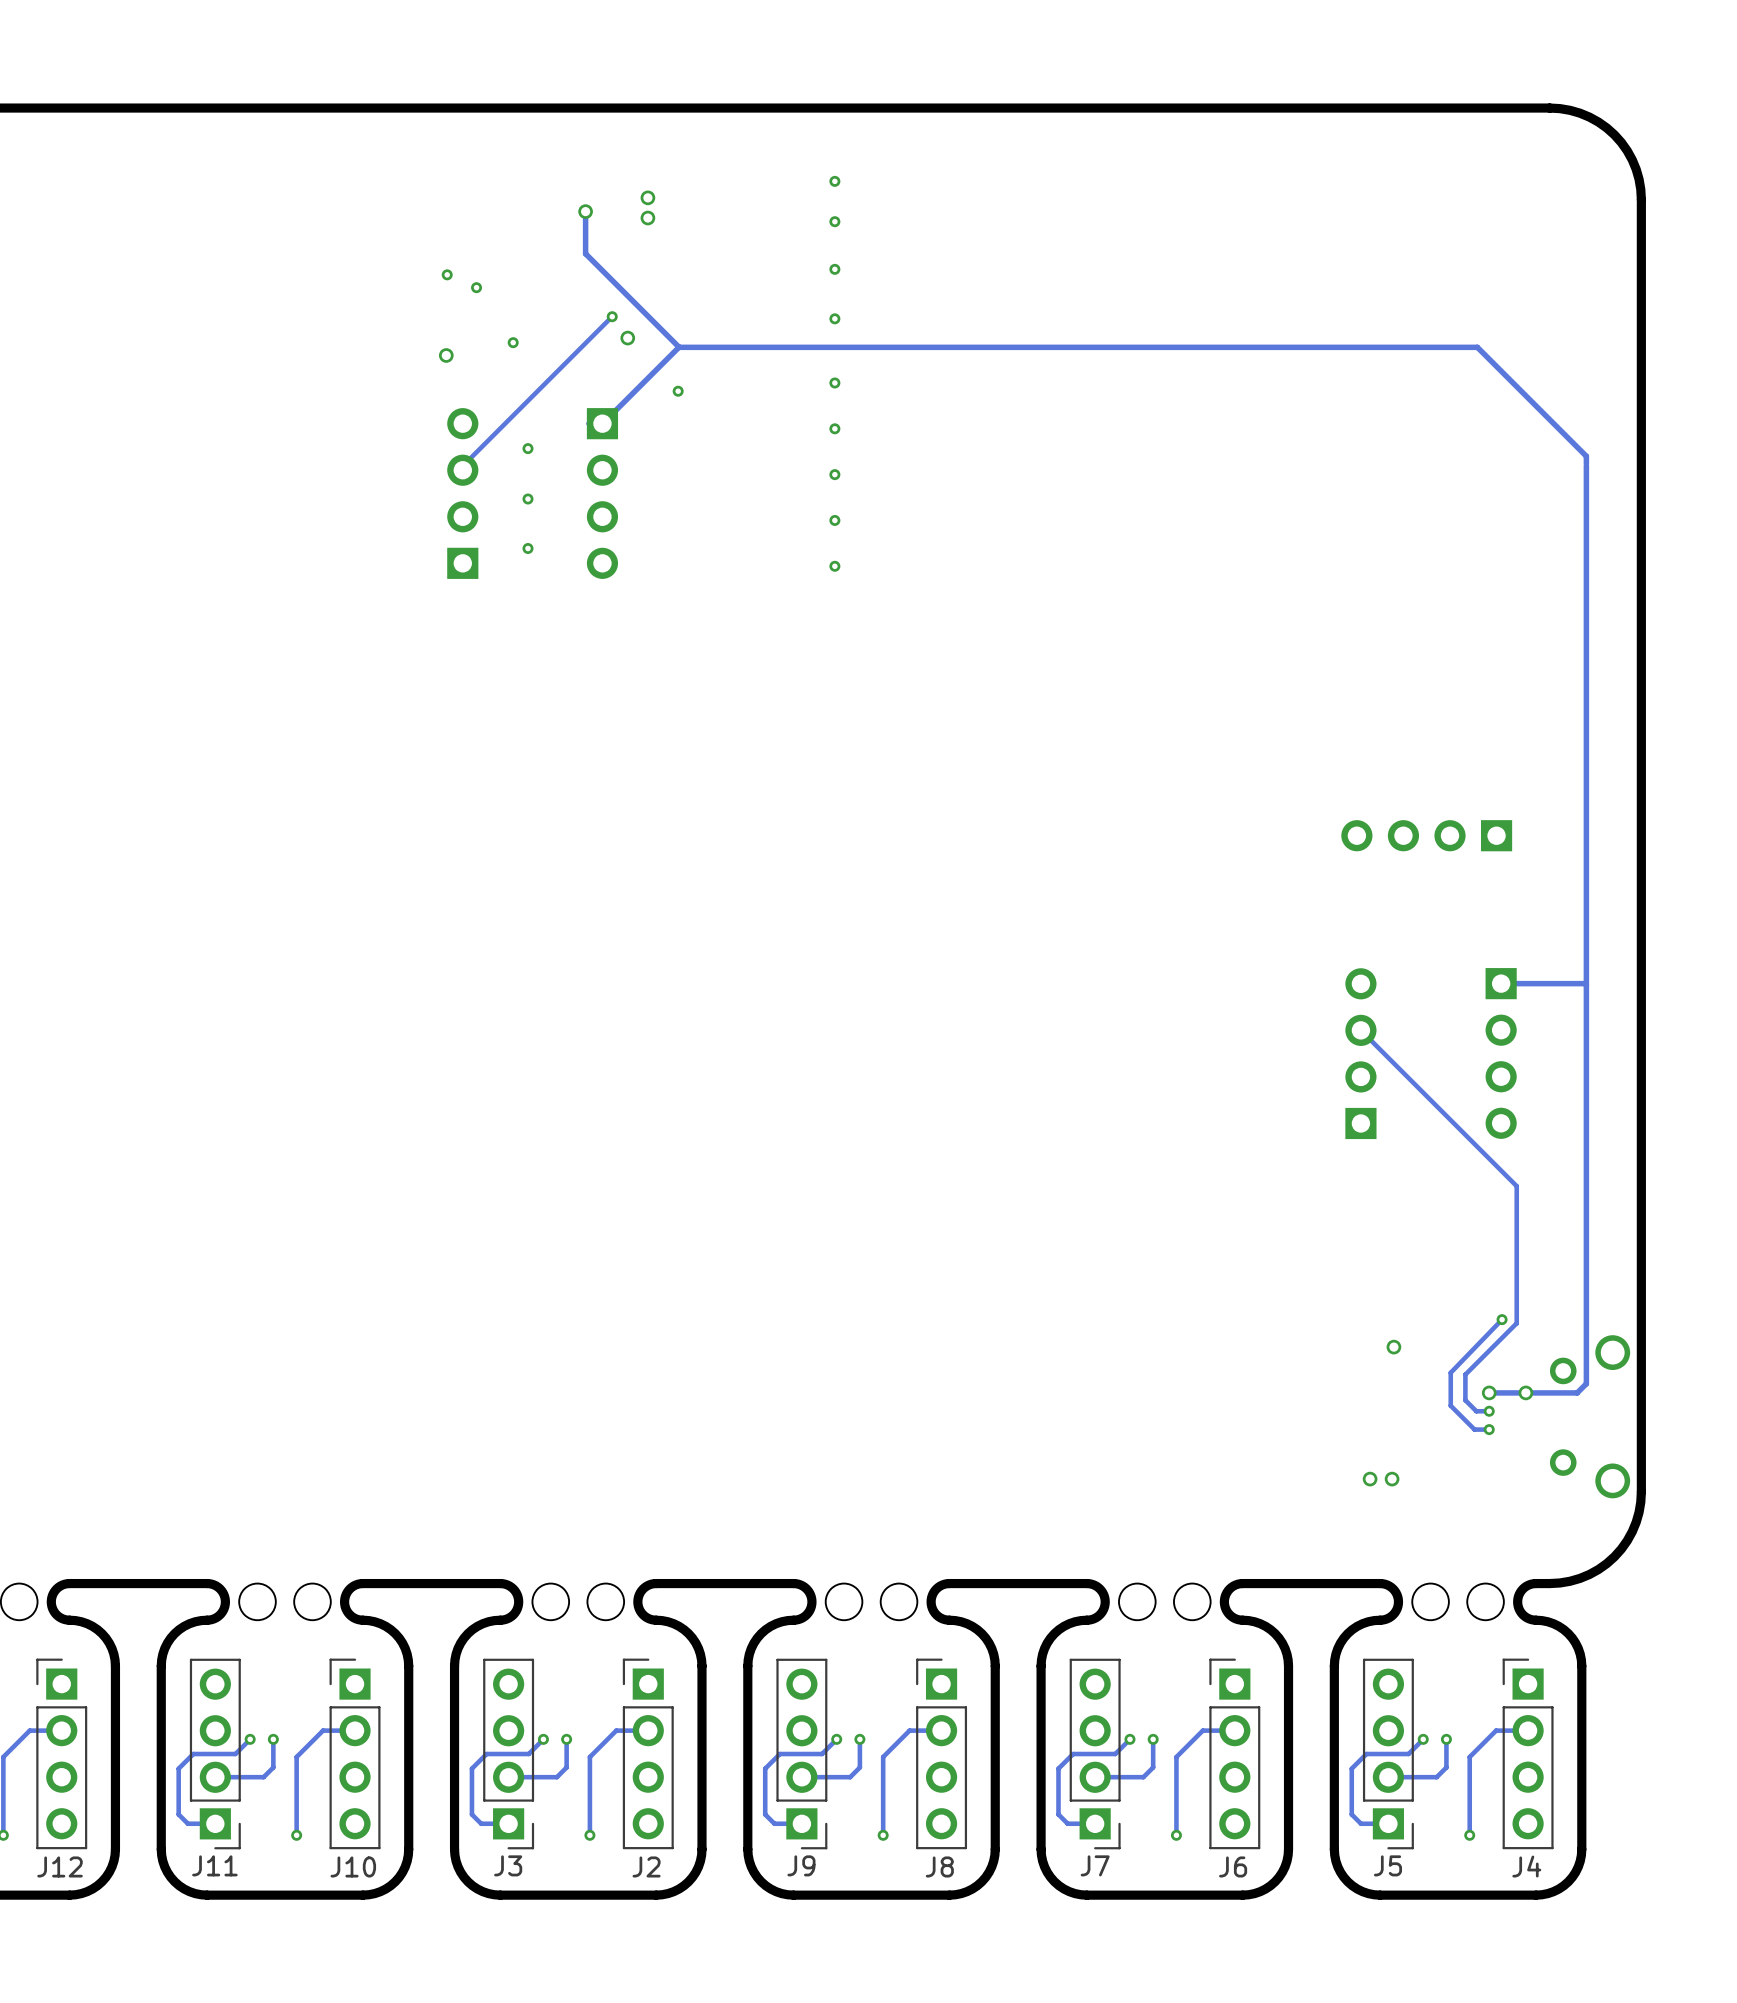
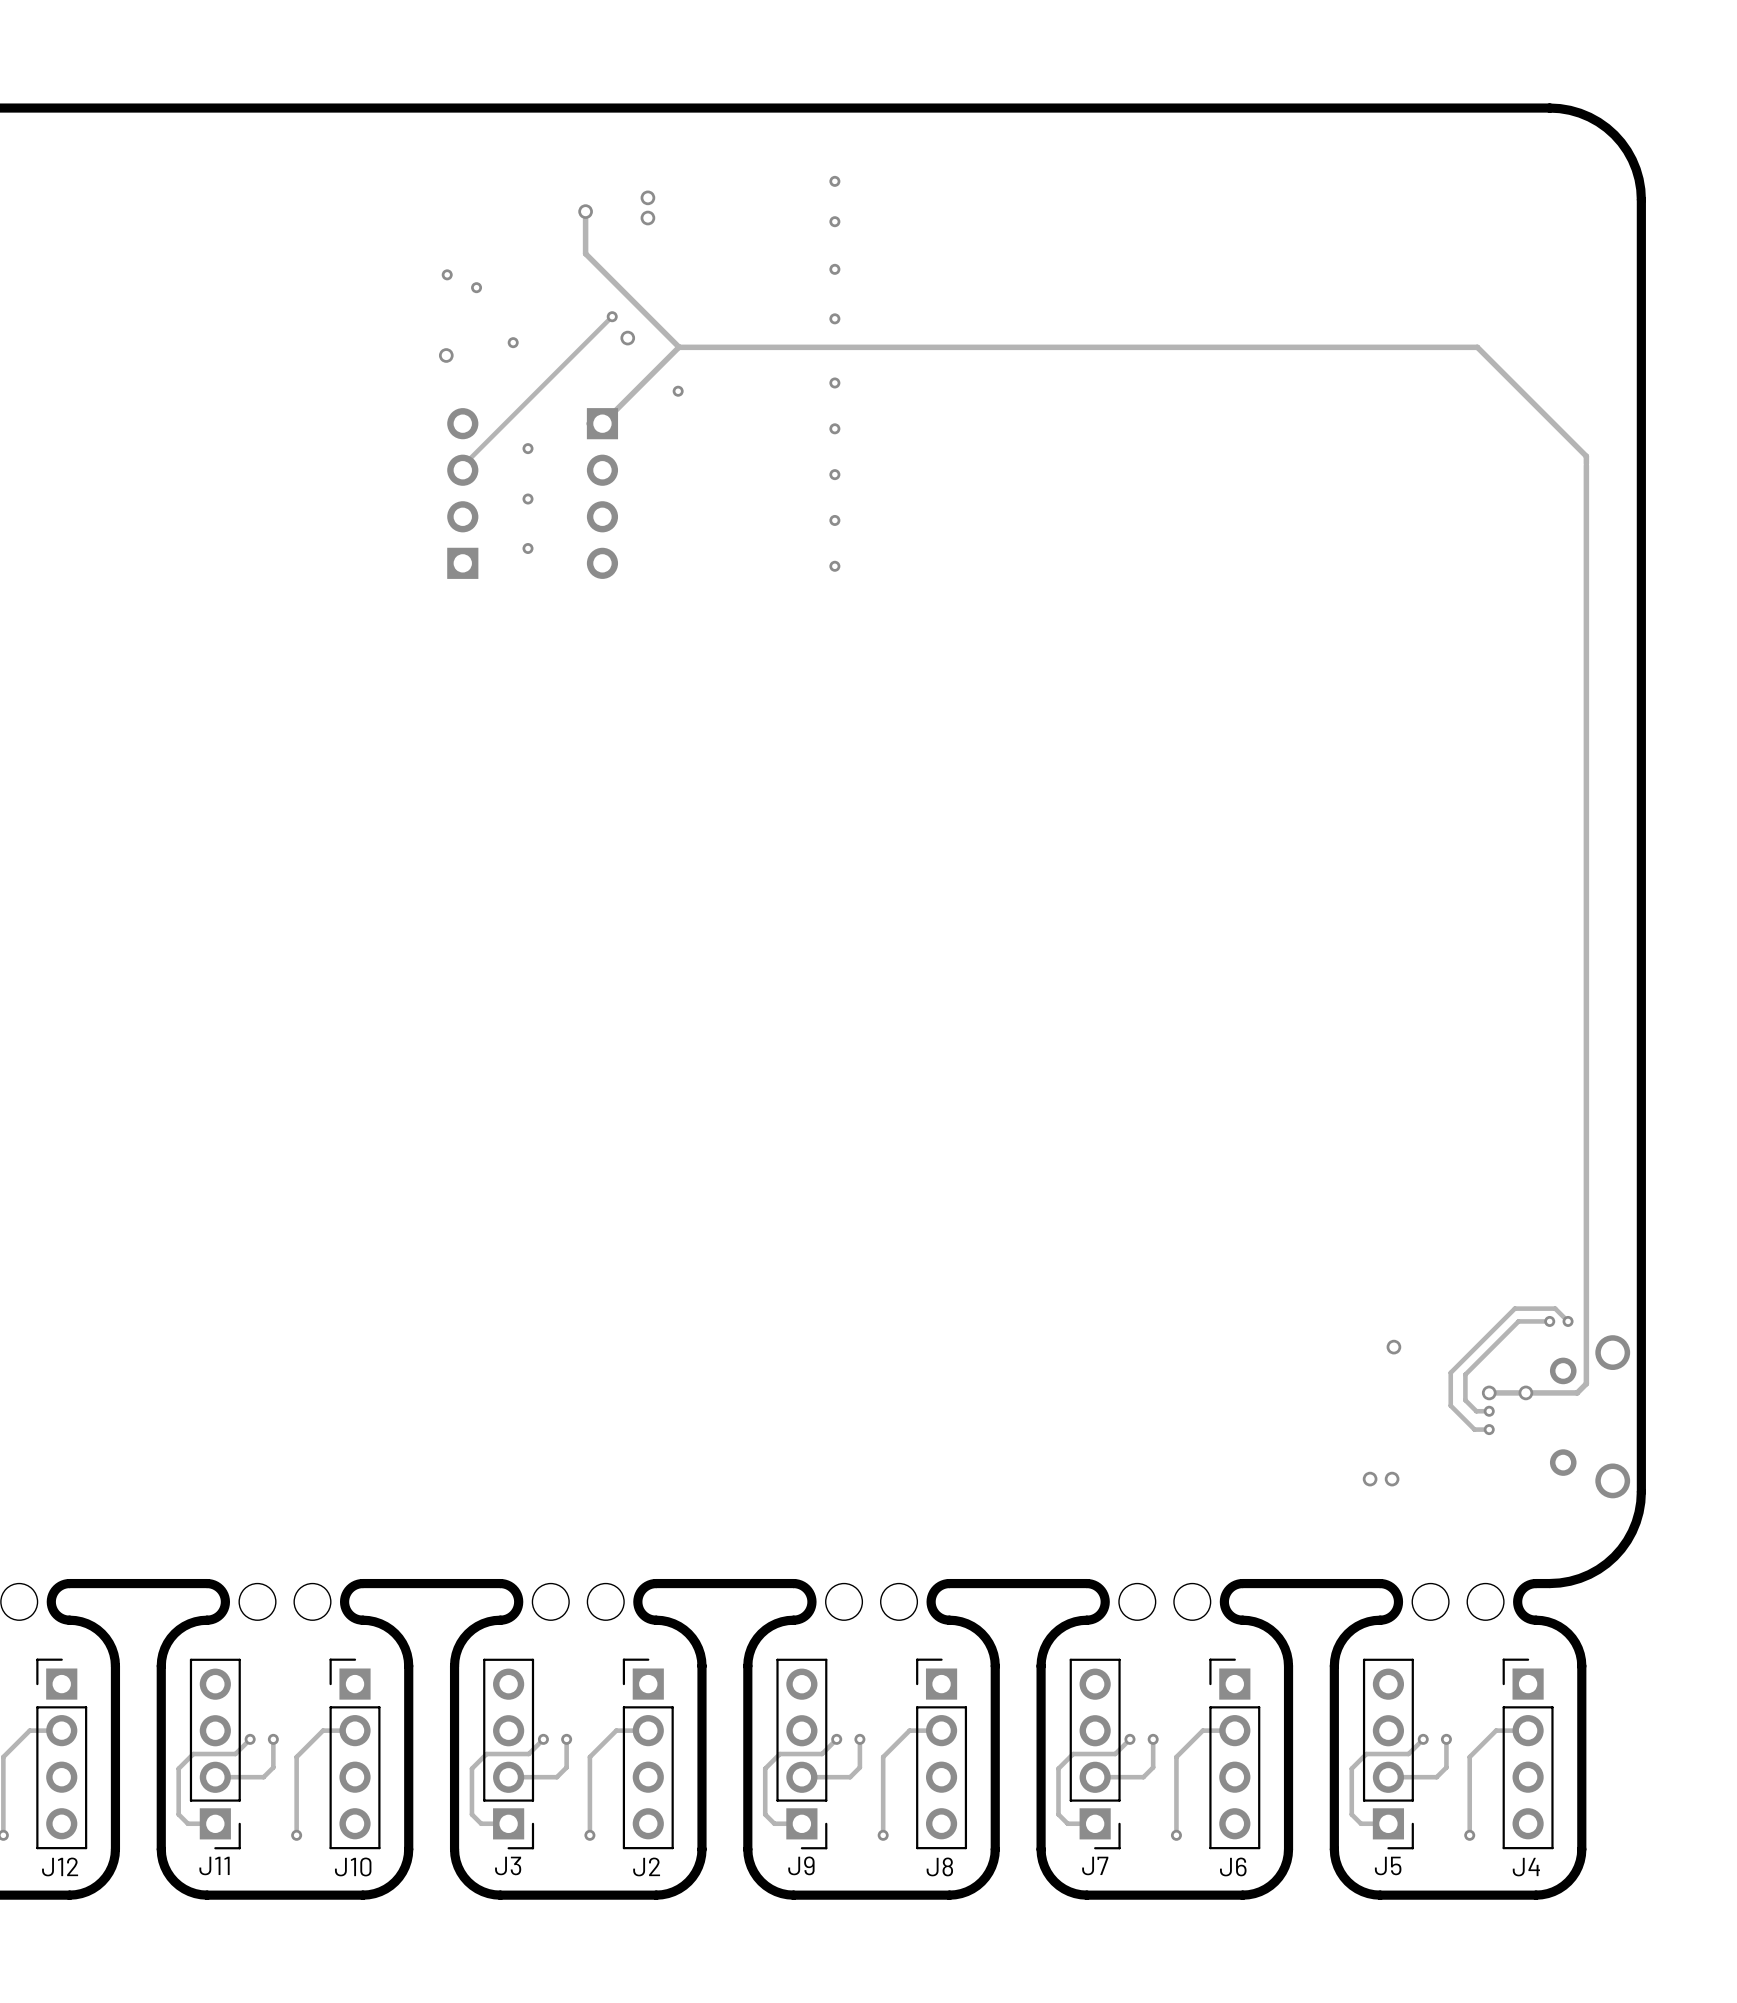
part: (1426, 835) -> none
track: (1501, 983) (1586, 984) -> none
track: (1360, 1030) (1516, 1186) (1516, 1323) -> (1549, 1321) (1518, 1321) (1516, 1323)
part: (1360, 1053) -> none
part: (1501, 1053) -> none
track: (1502, 1319) (1450, 1372) -> (1568, 1321) (1555, 1308) (1514, 1308) (1450, 1372)
via: (1502, 1319) -> none
via: none -> (1549, 1321)
via: none -> (1568, 1321)

